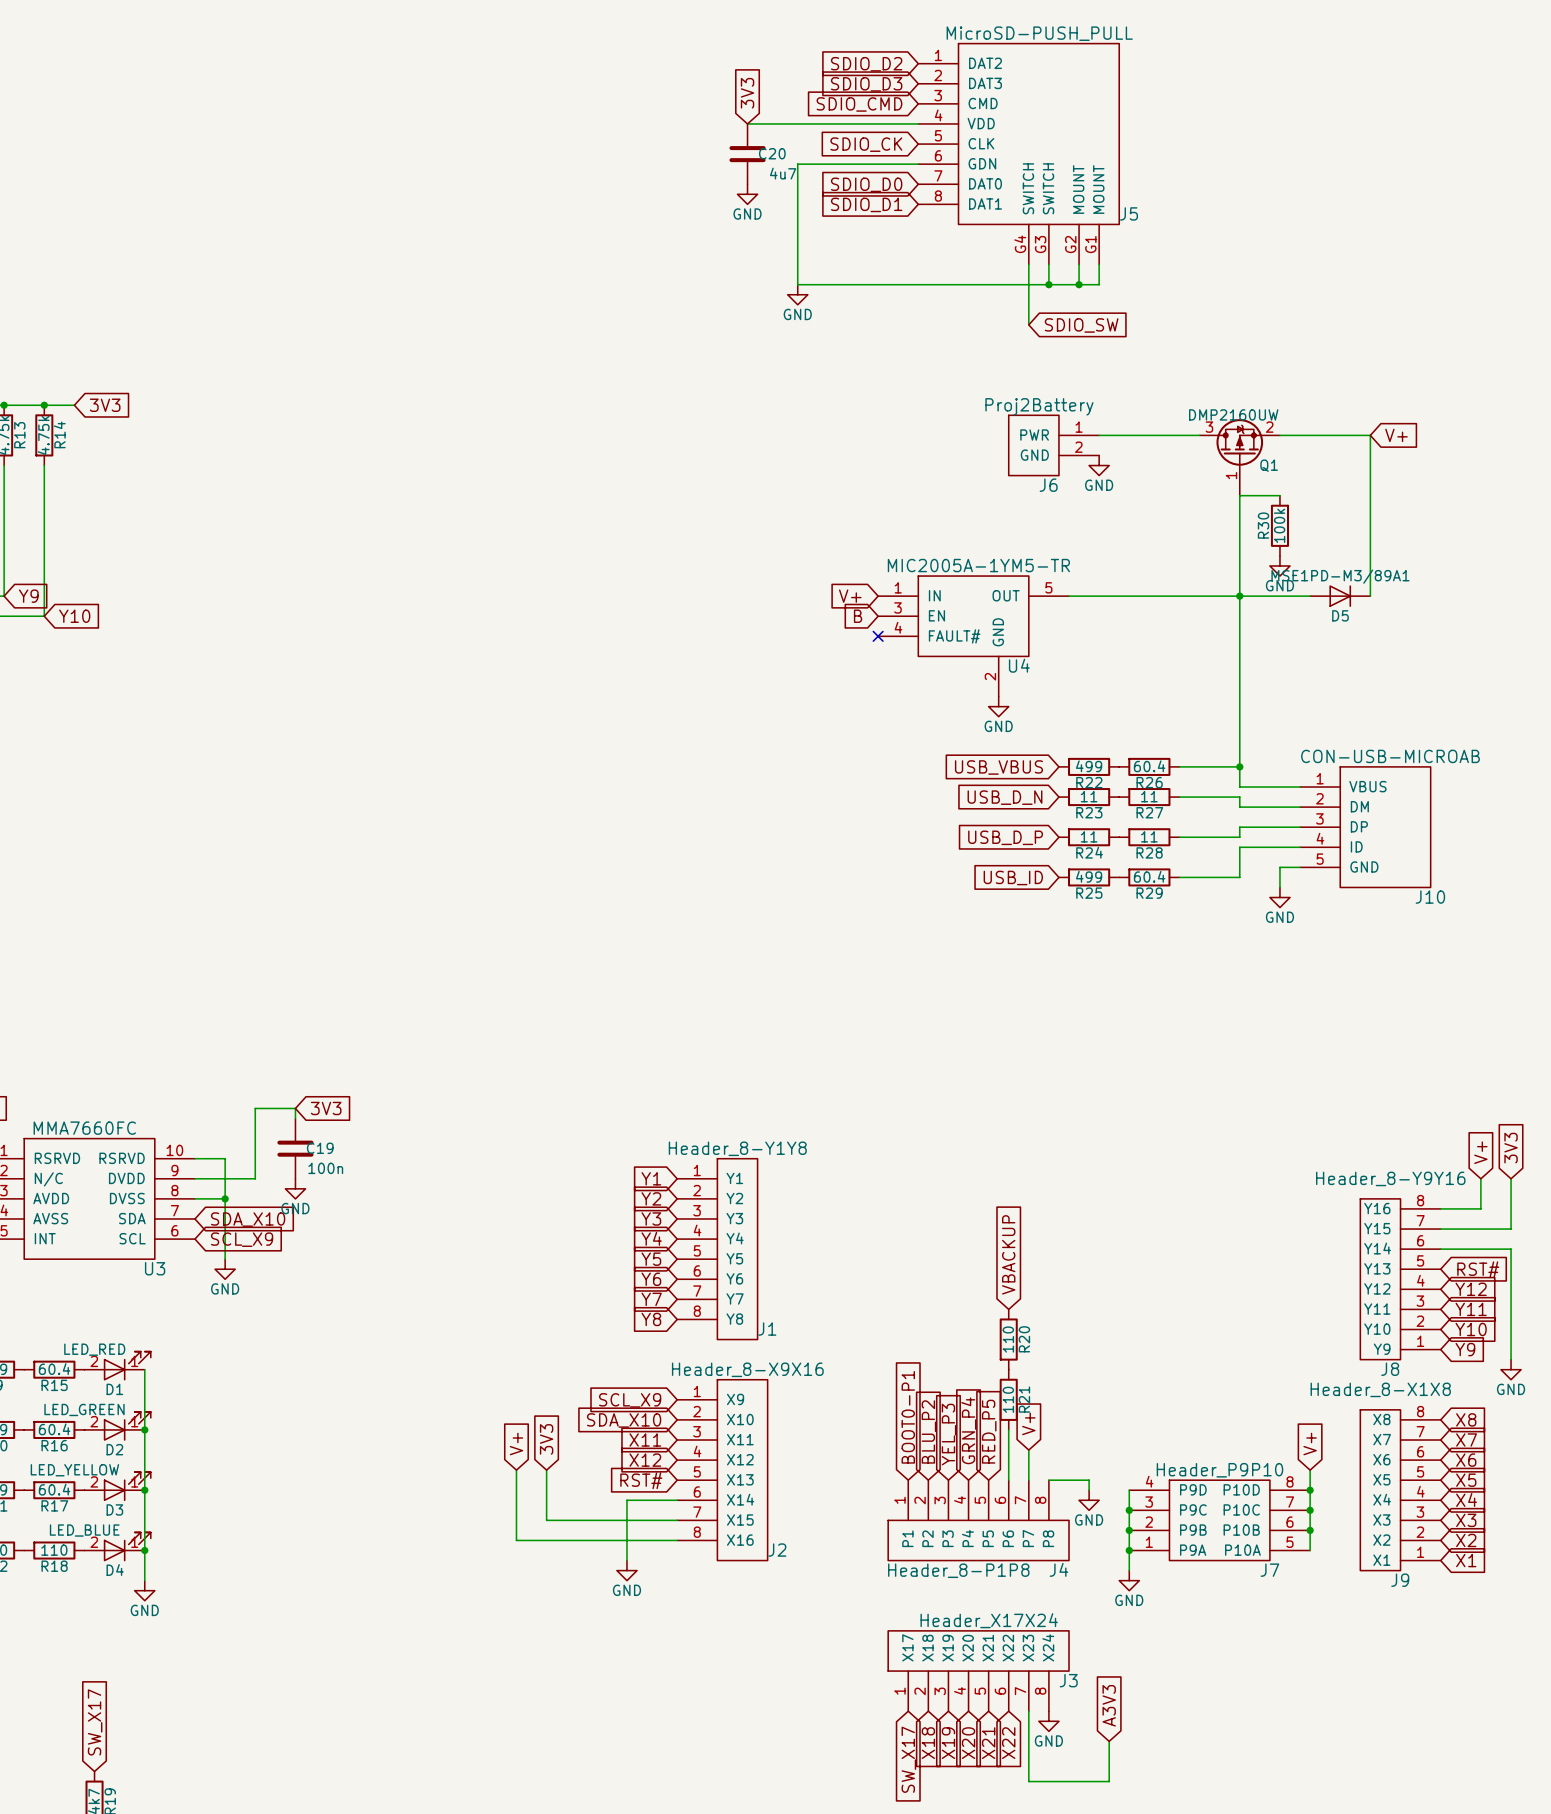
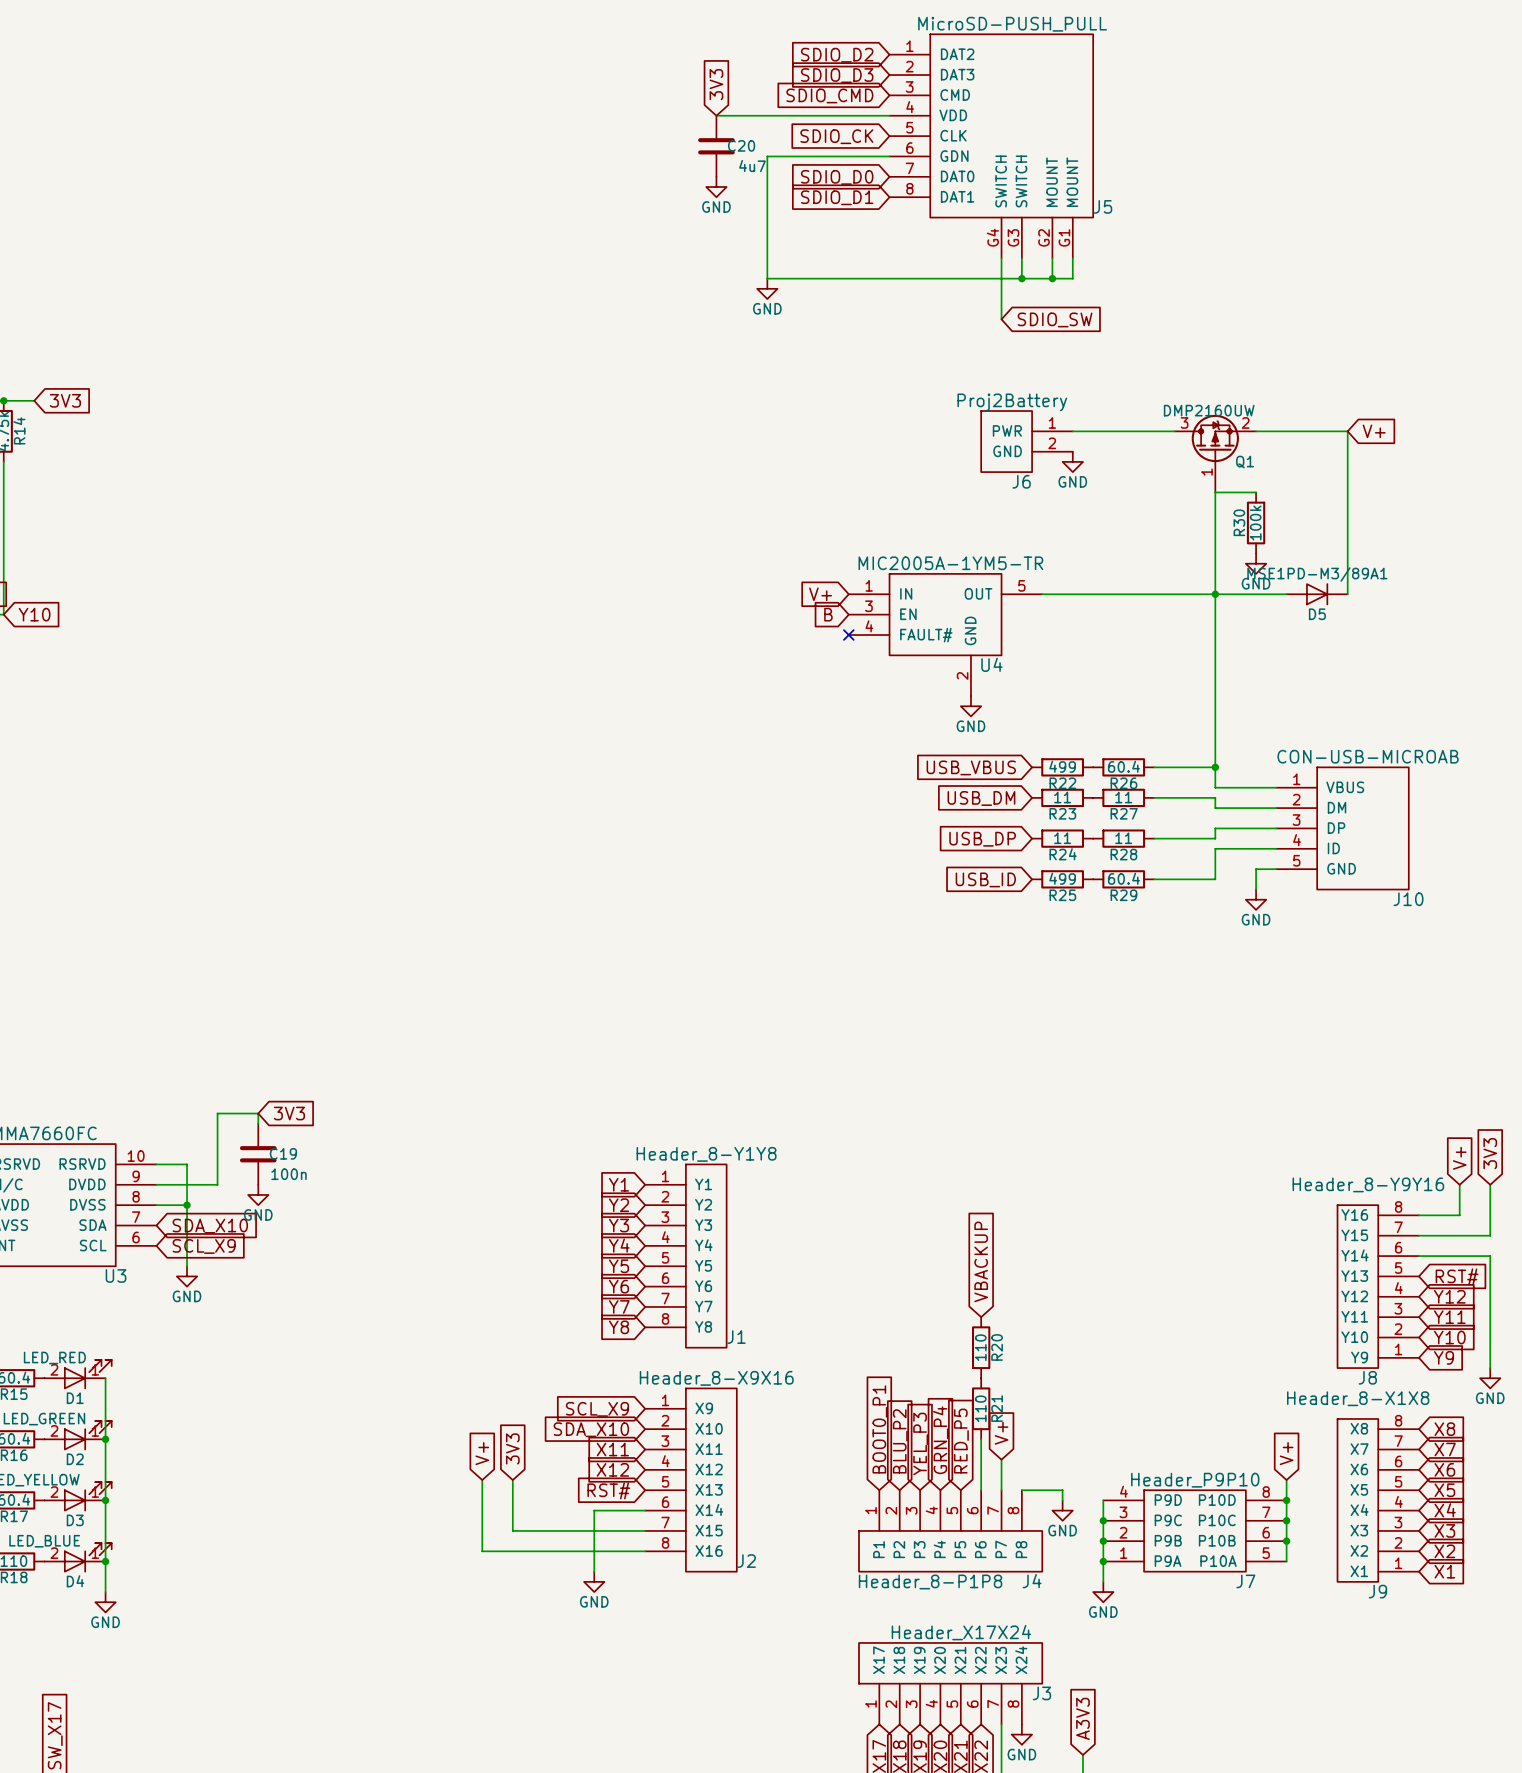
global label: USB_D_N (1004, 797) -> USB_DM (981, 798)
global label: USB_D_P (1005, 837) -> USB_DP (982, 839)
global label: BOOT0-P1 (908, 1417) -> BOOT0_P1 (879, 1429)

